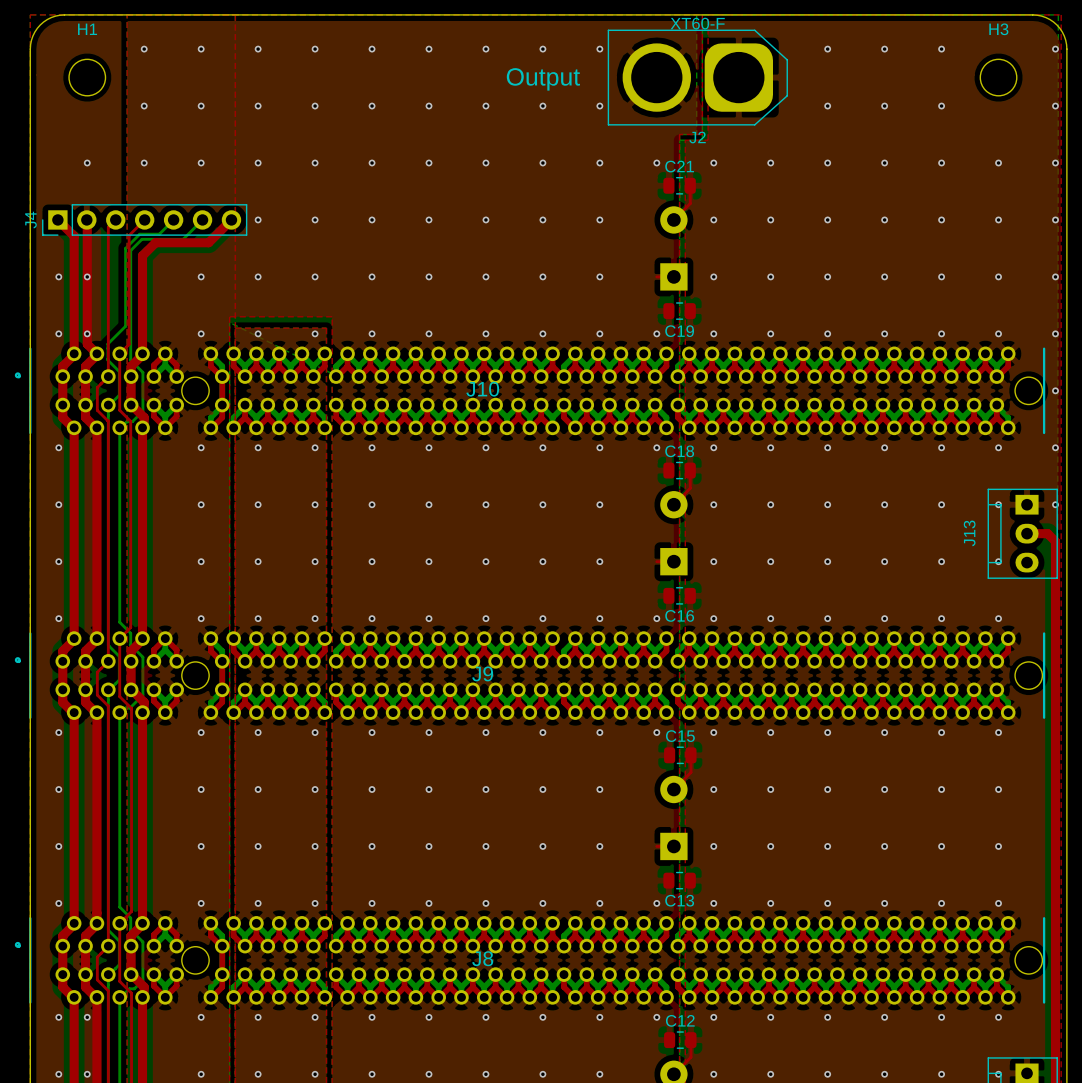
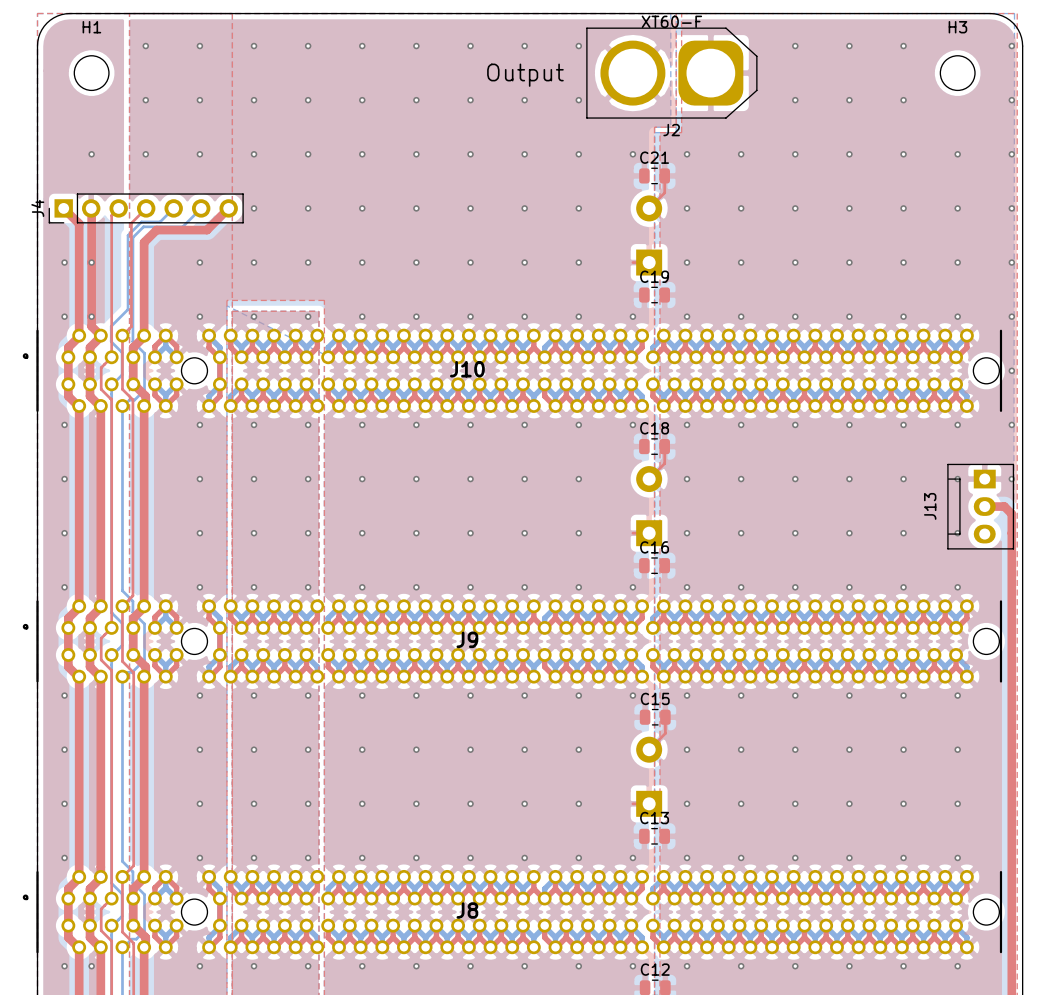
C19 name position: C19 (679, 331) -> C19 (654, 276)
C16 name position: C16 (679, 615) -> C16 (654, 547)
C13 name position: C13 (679, 900) -> C13 (654, 818)

